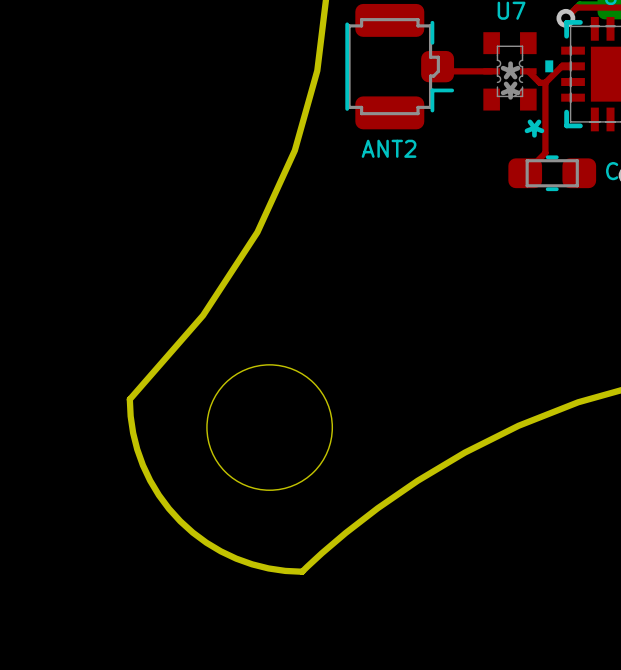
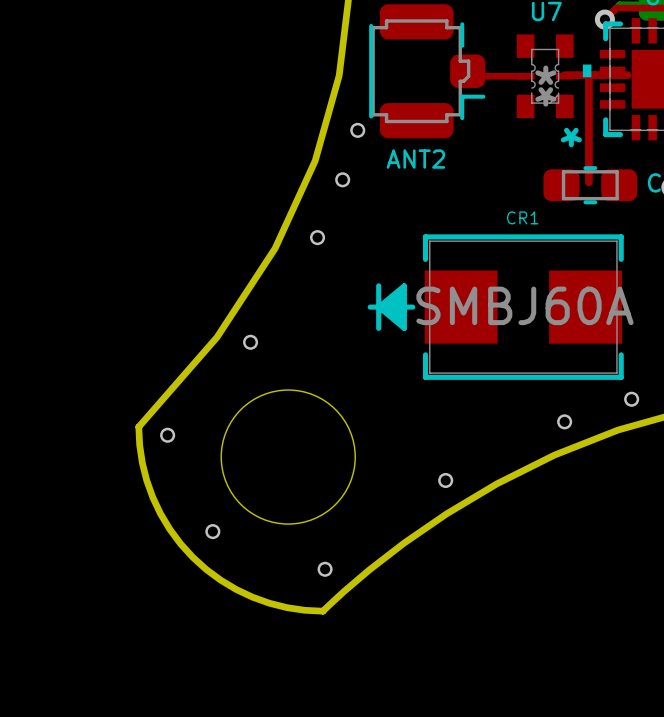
top track: (573, 66) (561, 66) (545, 82) -> none
top track: none -> (588, 75) (588, 182)
top track: (528, 71) (539, 82) (545, 82) -> (564, 75) (627, 75)
top track: (545, 82) (545, 153) (525, 173) (535, 163) -> none
via: none -> (357, 130)
via: none -> (342, 179)
via: none -> (317, 237)
CR1: none -> SMBJ60A (495, 307)
via: none -> (250, 342)
via: none -> (631, 399)
via: none -> (564, 421)
via: none -> (167, 435)
via: none -> (445, 480)
via: none -> (212, 531)
via: none -> (325, 569)

